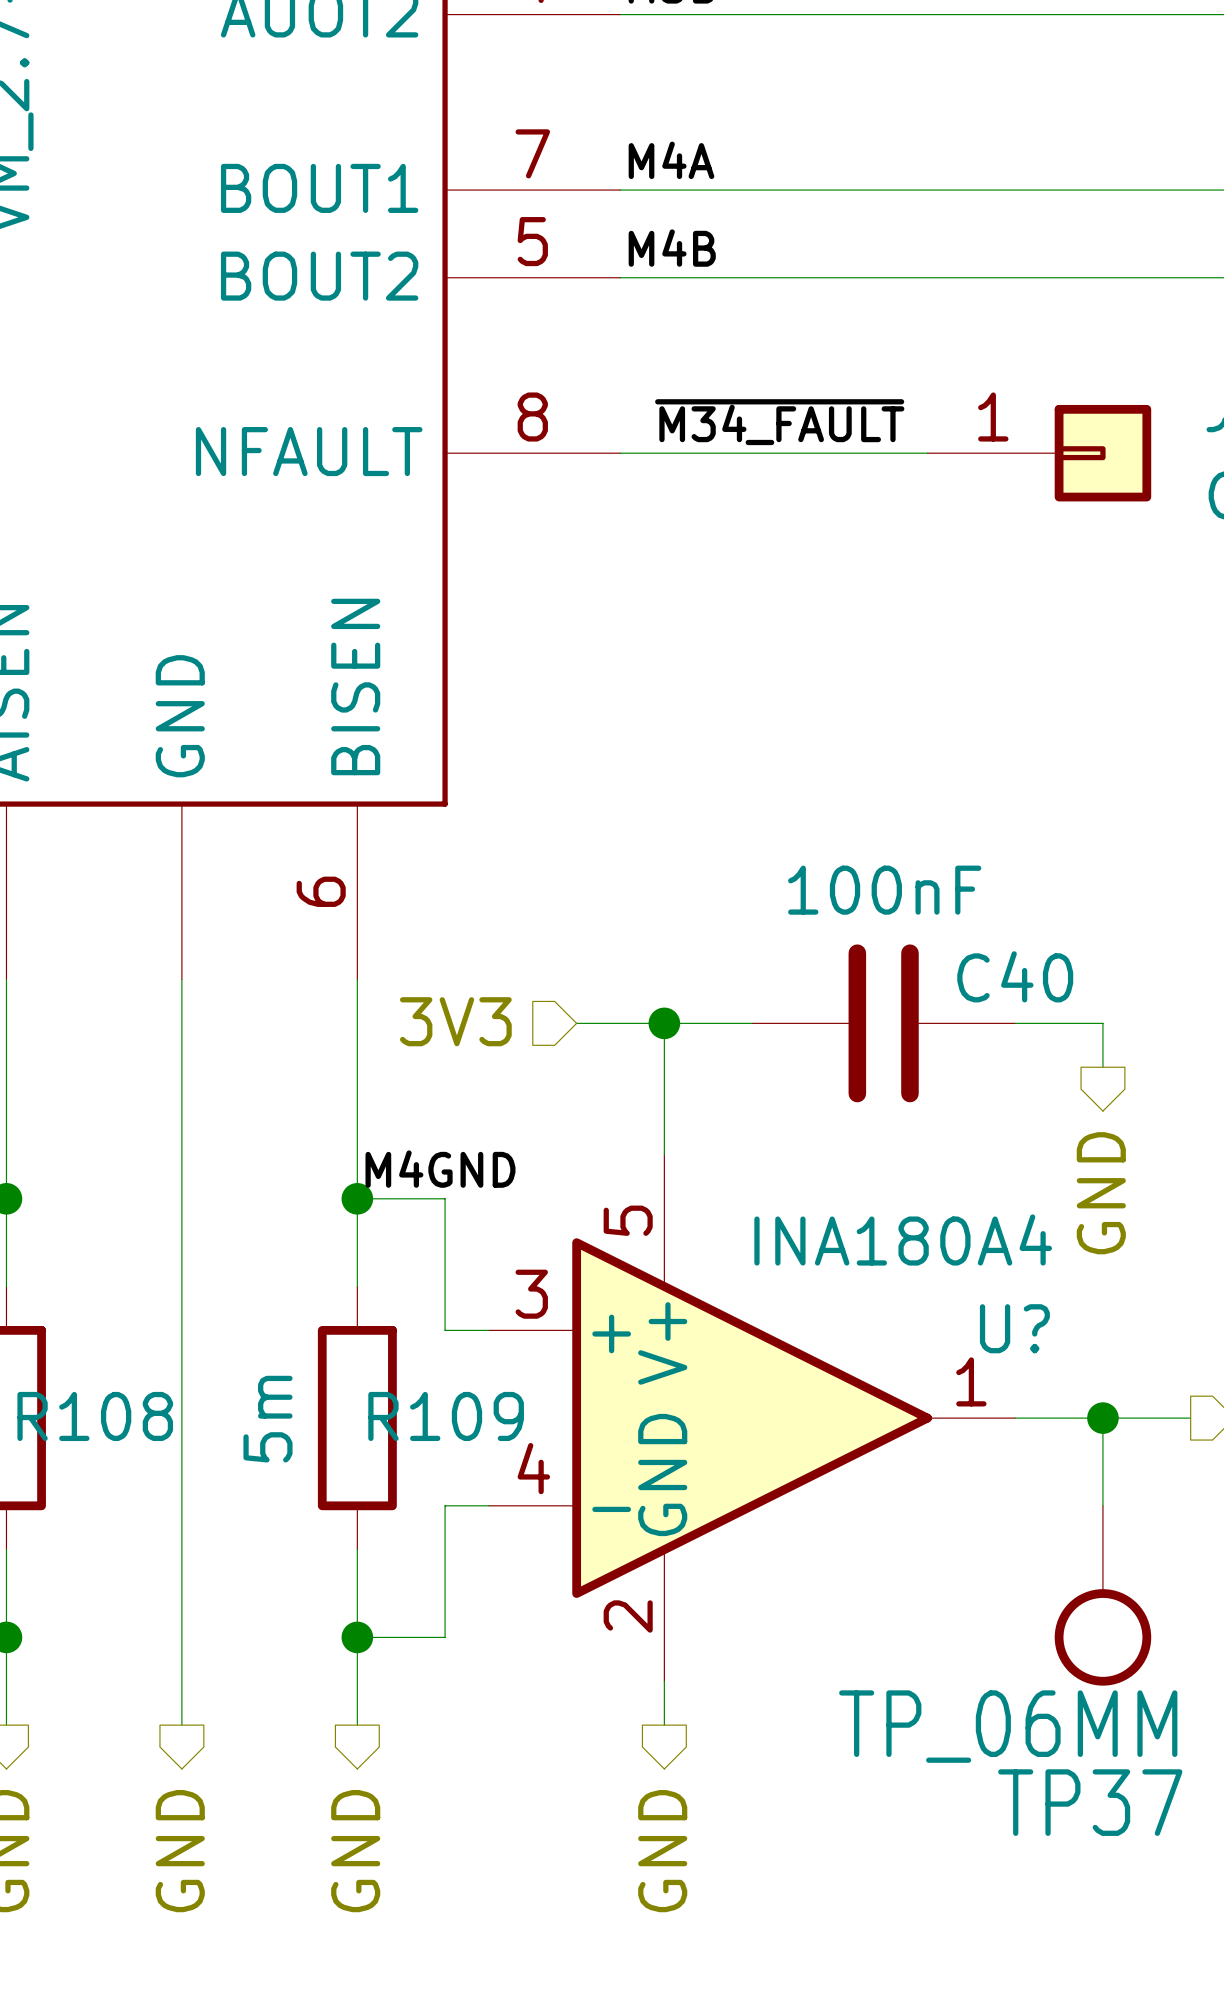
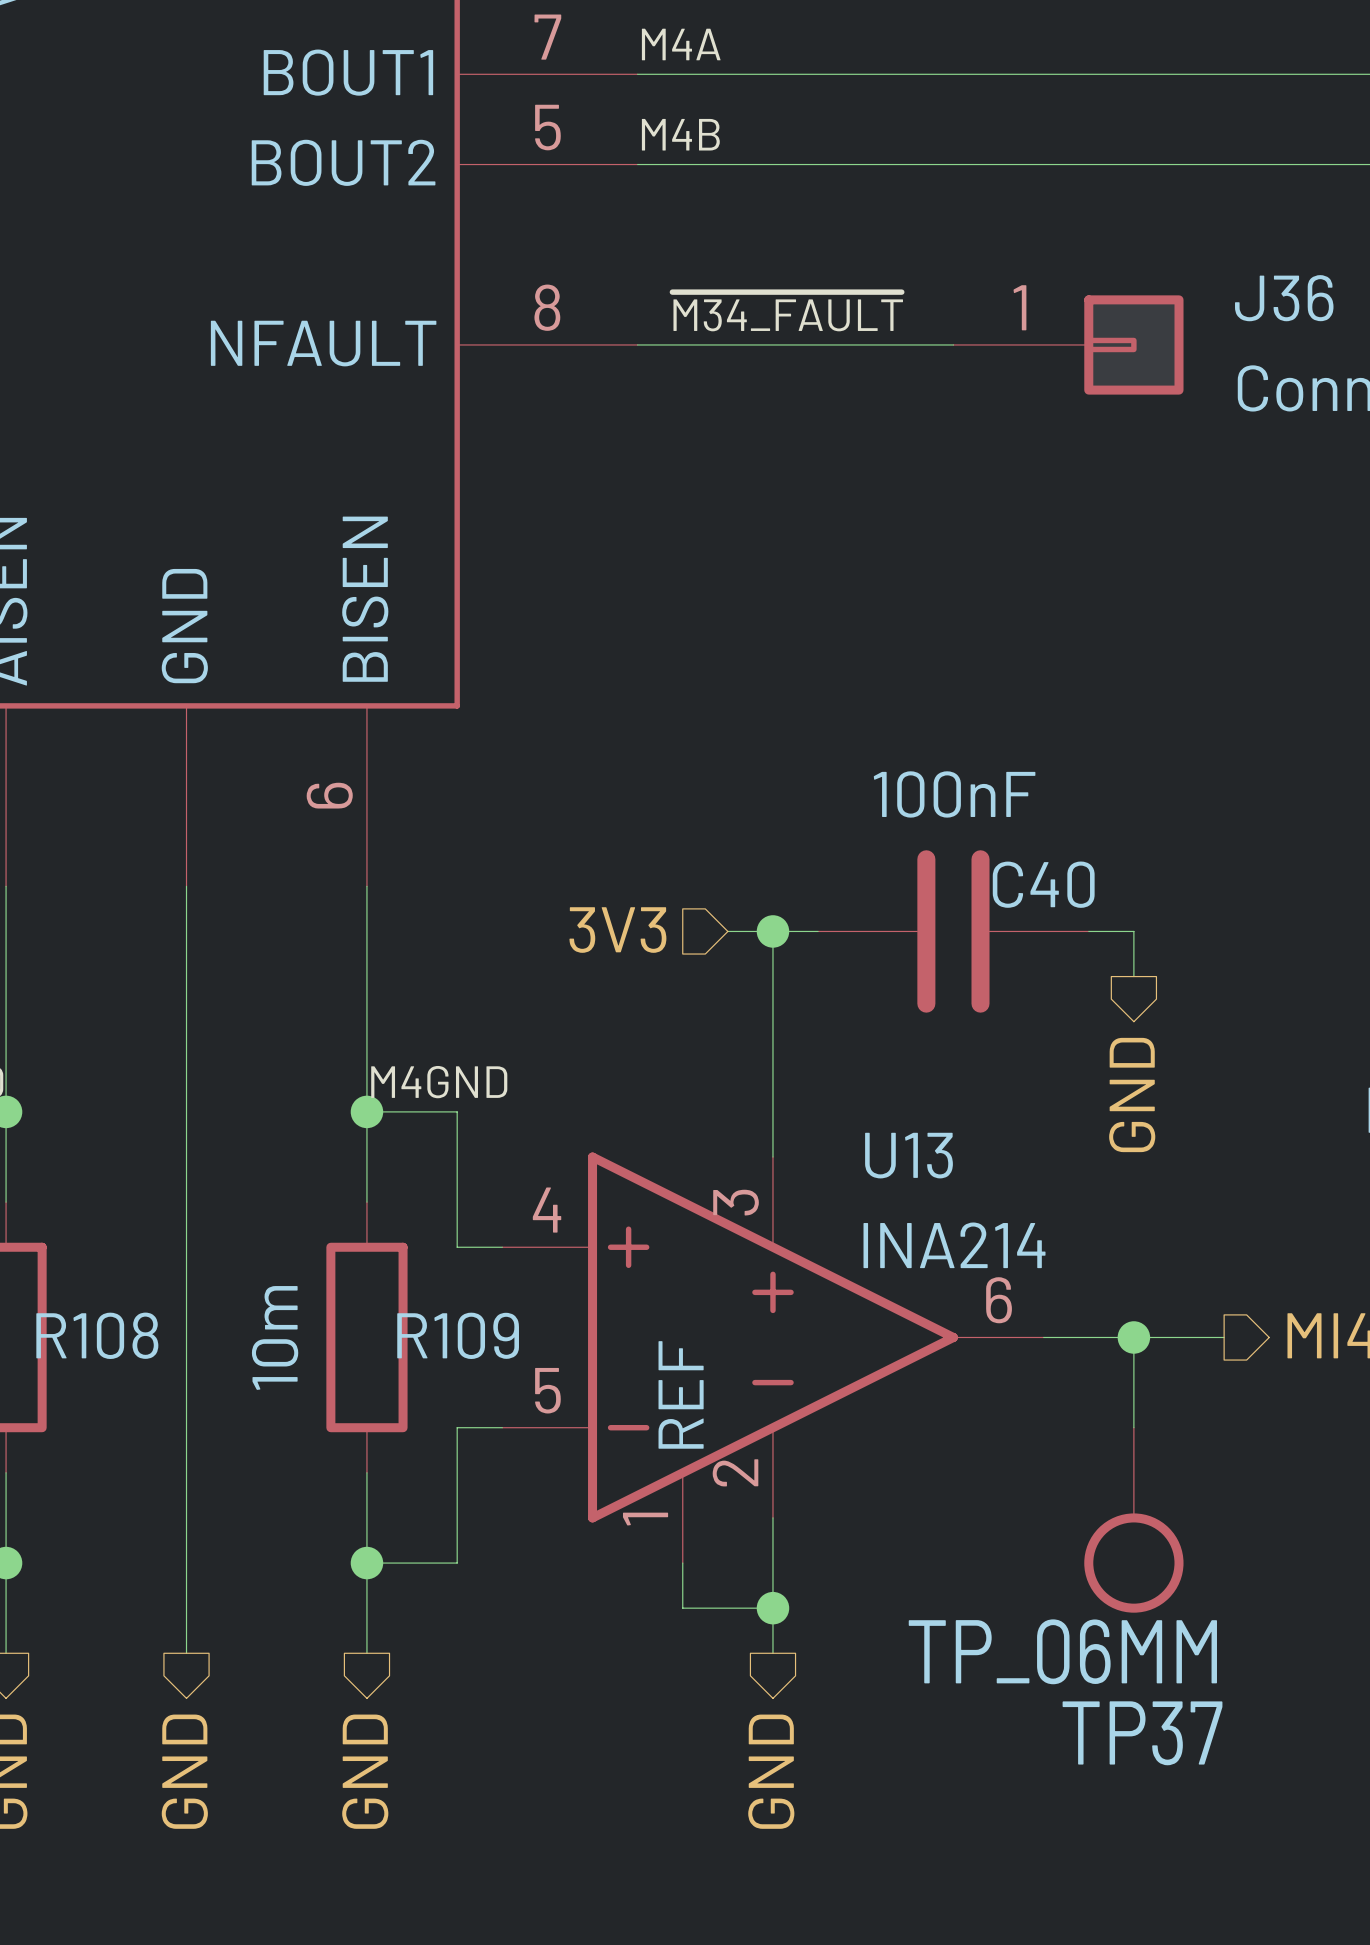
hierarchical label position: 3V3 (455, 1021) -> 3V3 (617, 930)
wire: (576, 1023) (708, 1023) -> none
wire: (664, 1023) (664, 1154) -> (772, 1517) (772, 1653)
junction position: (664, 1023) -> (772, 931)
wire: none -> (818, 931) (772, 931) (772, 1157)
C40 position: (883, 1023) -> (953, 931)
U?: INA180A4 (752, 1418) -> none
R109 value: 5m (267, 1419) -> 10m (275, 1337)
U13: none -> INA214 (772, 1357)
wire: none -> (682, 1563) (682, 1608) (772, 1608)
wire: (664, 1681) (664, 1725) -> none
junction: none -> (772, 1608)
hierarchical label position: GND (662, 1851) -> GND (771, 1771)

